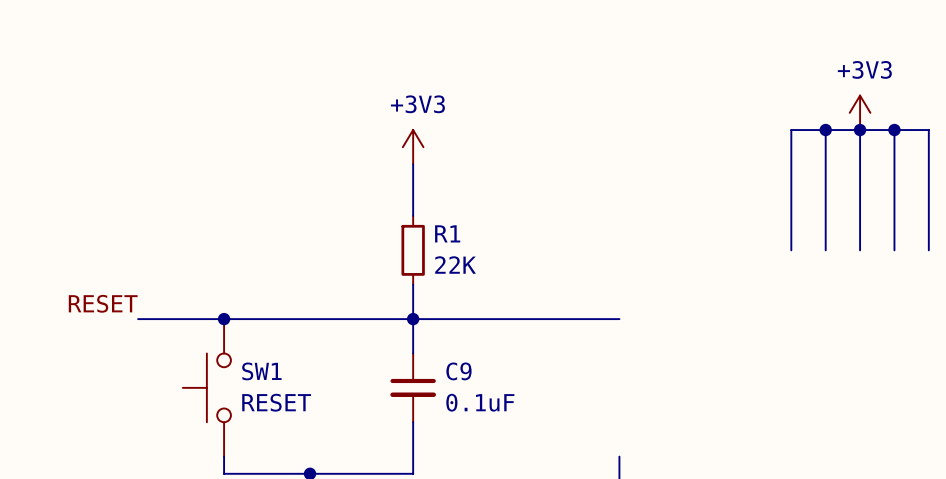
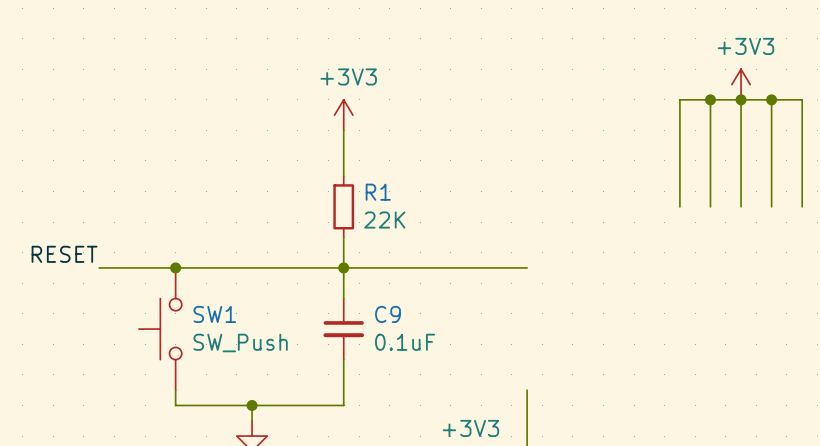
SW1 value: RESET (276, 402) -> SW_Push (240, 342)

